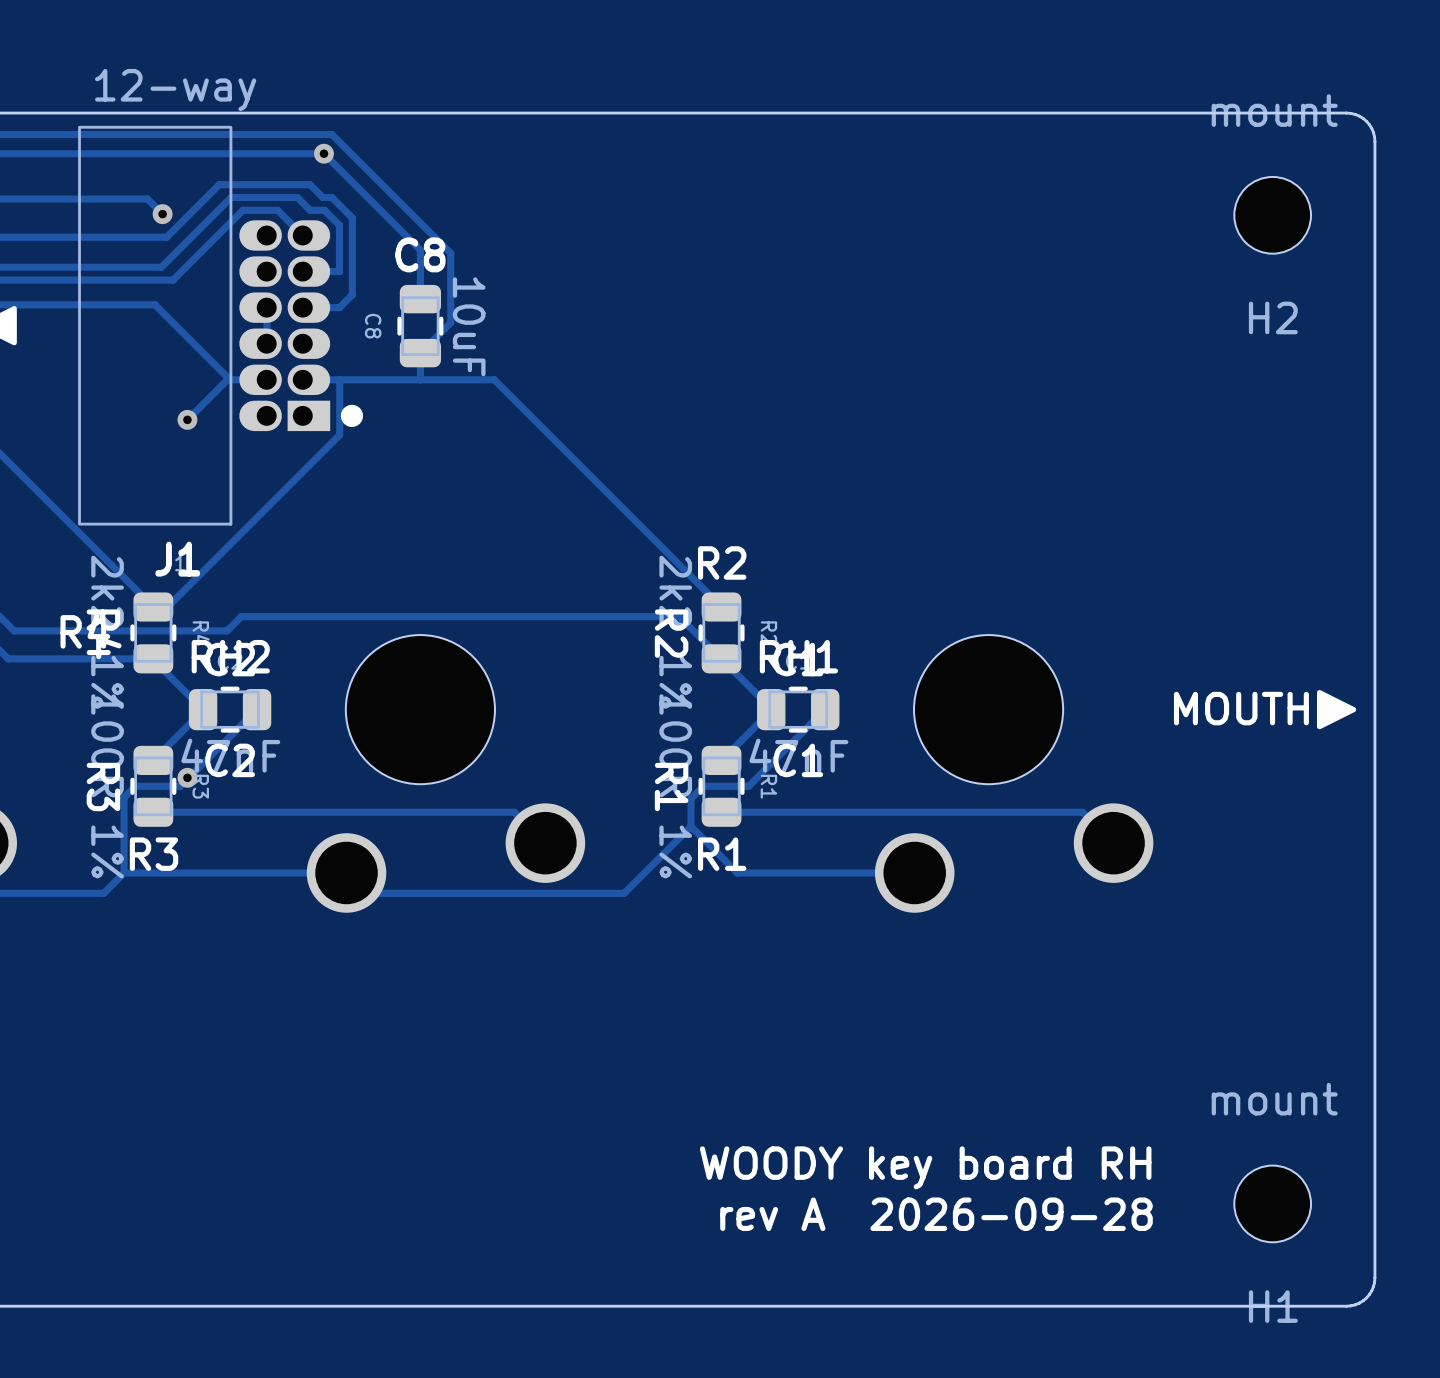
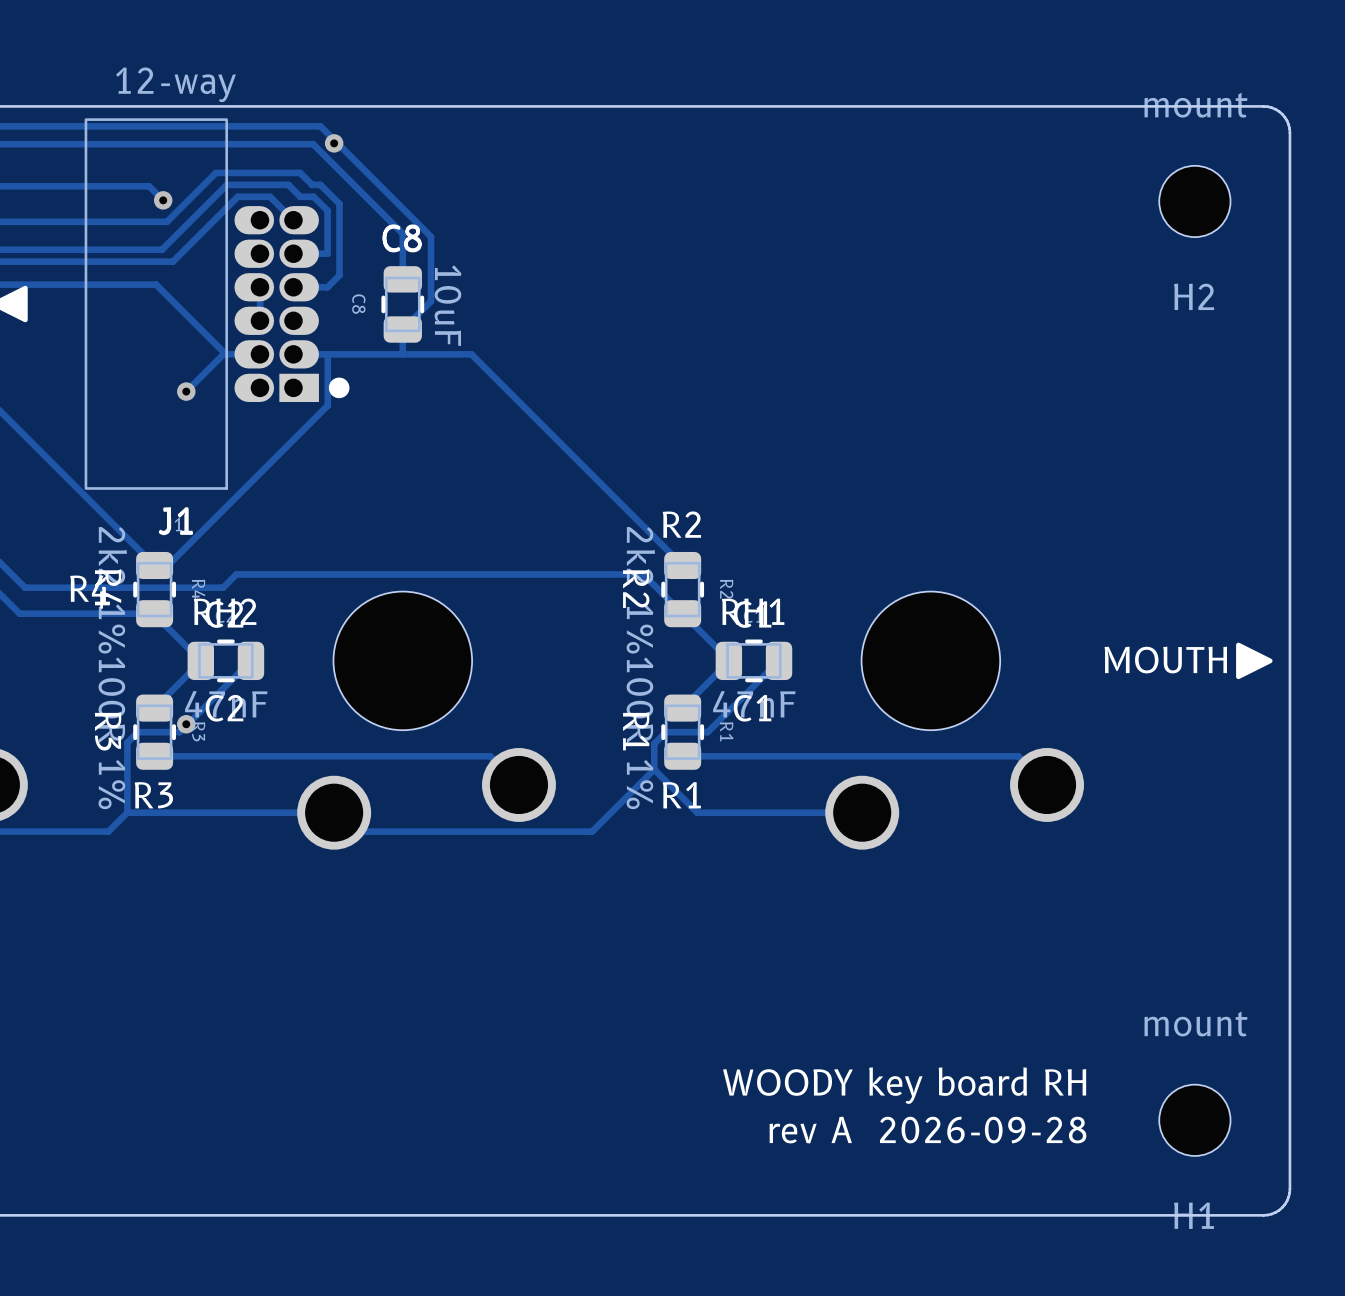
via position: (323, 153) -> (334, 143)

